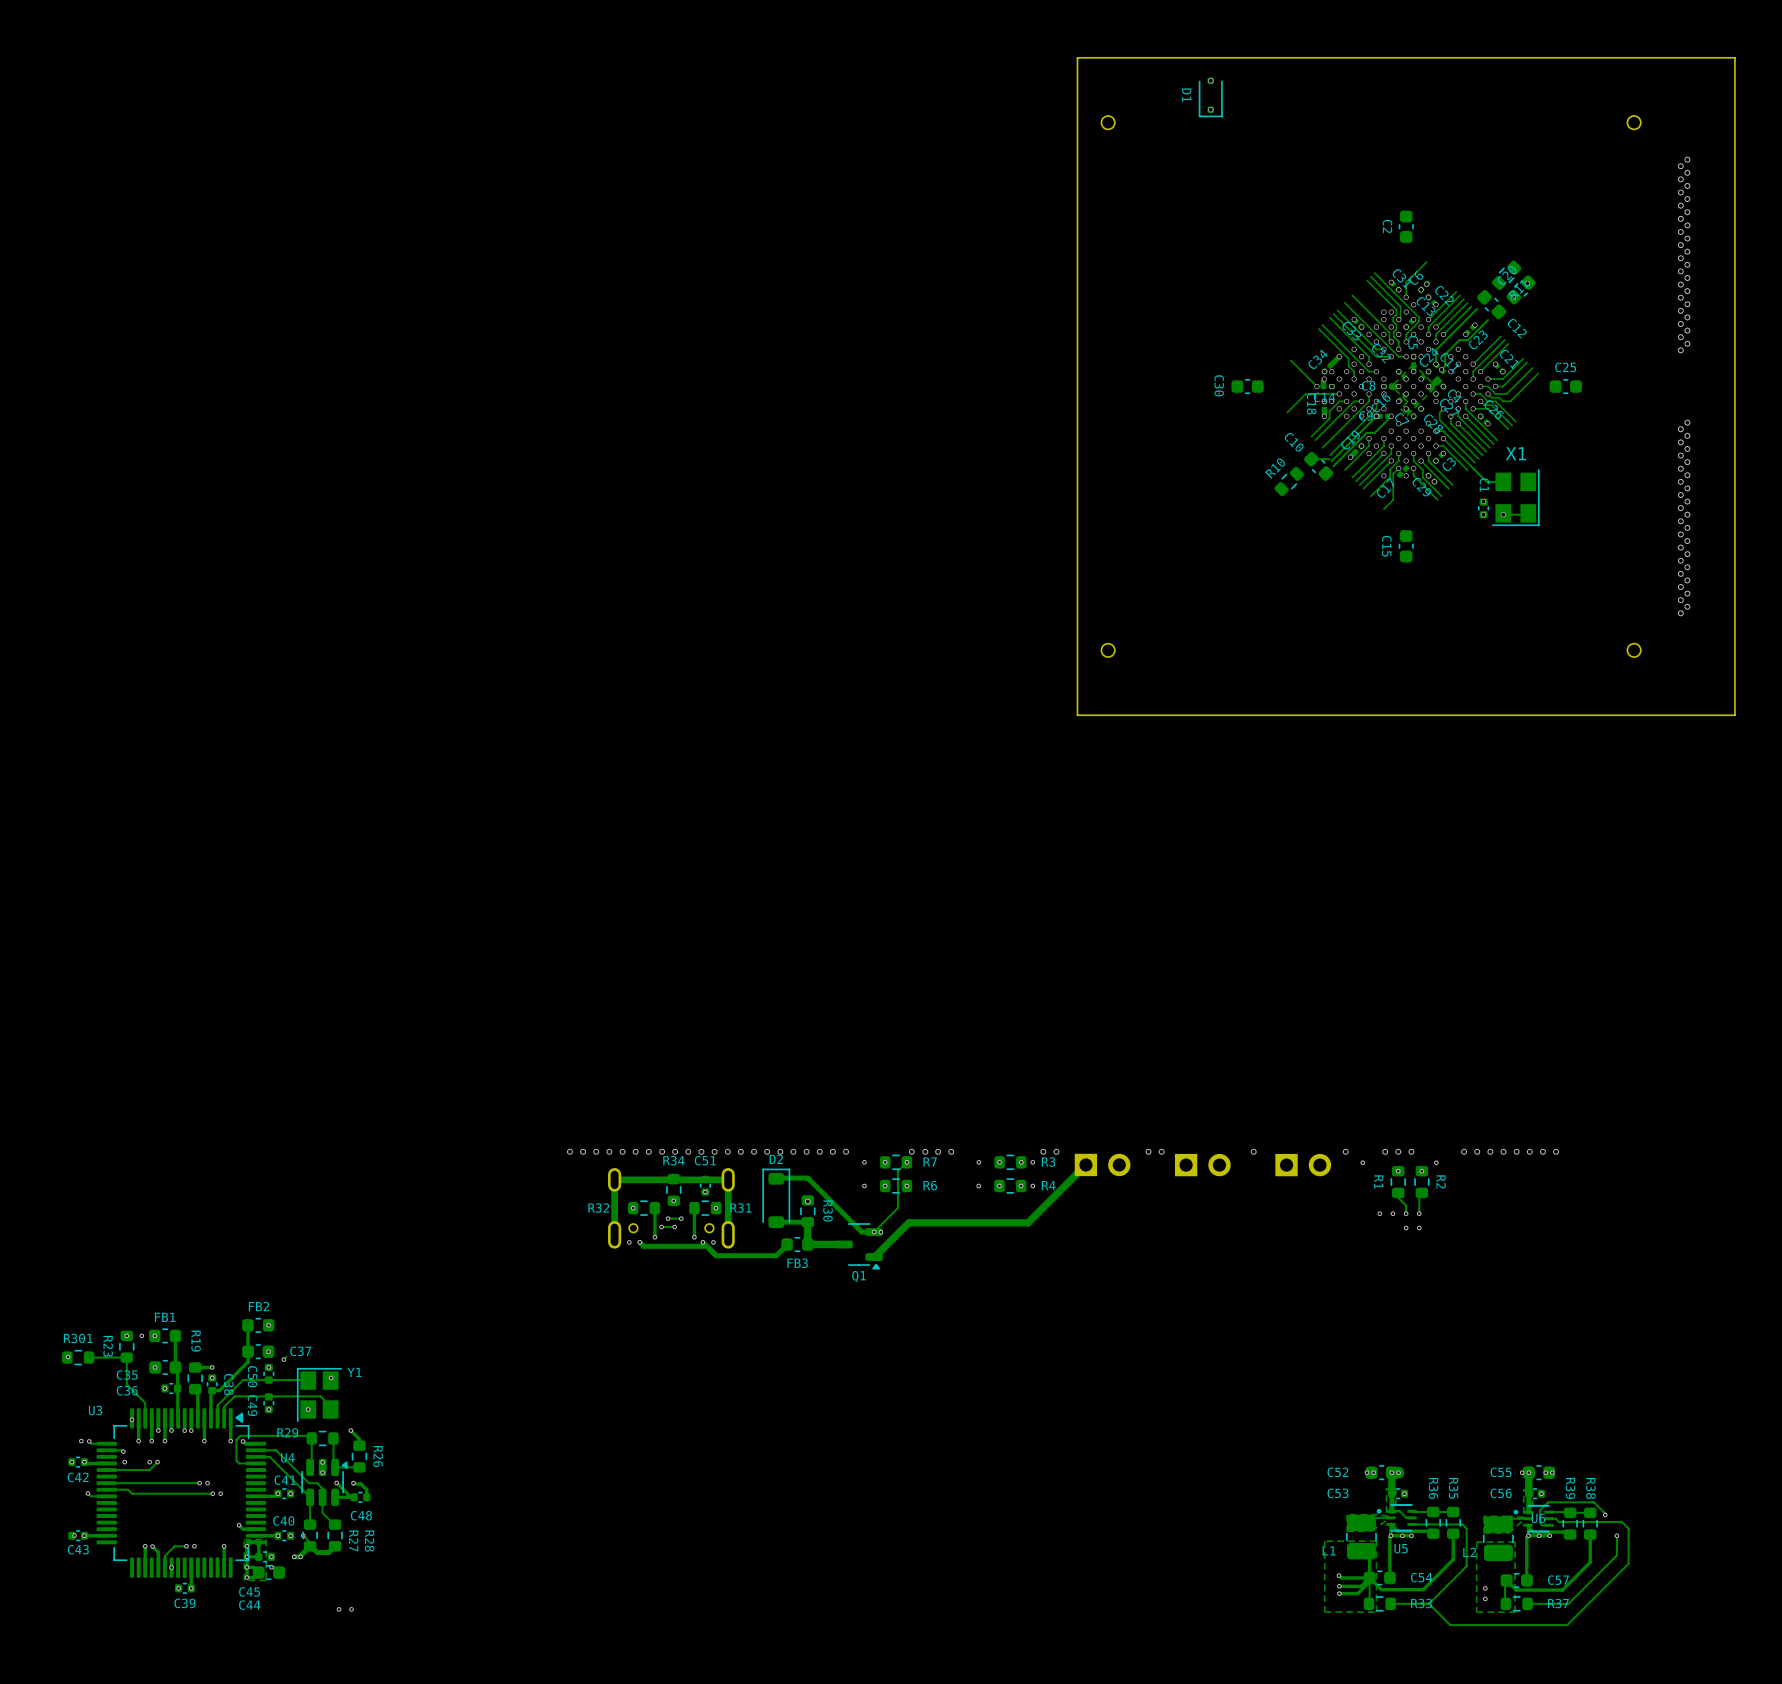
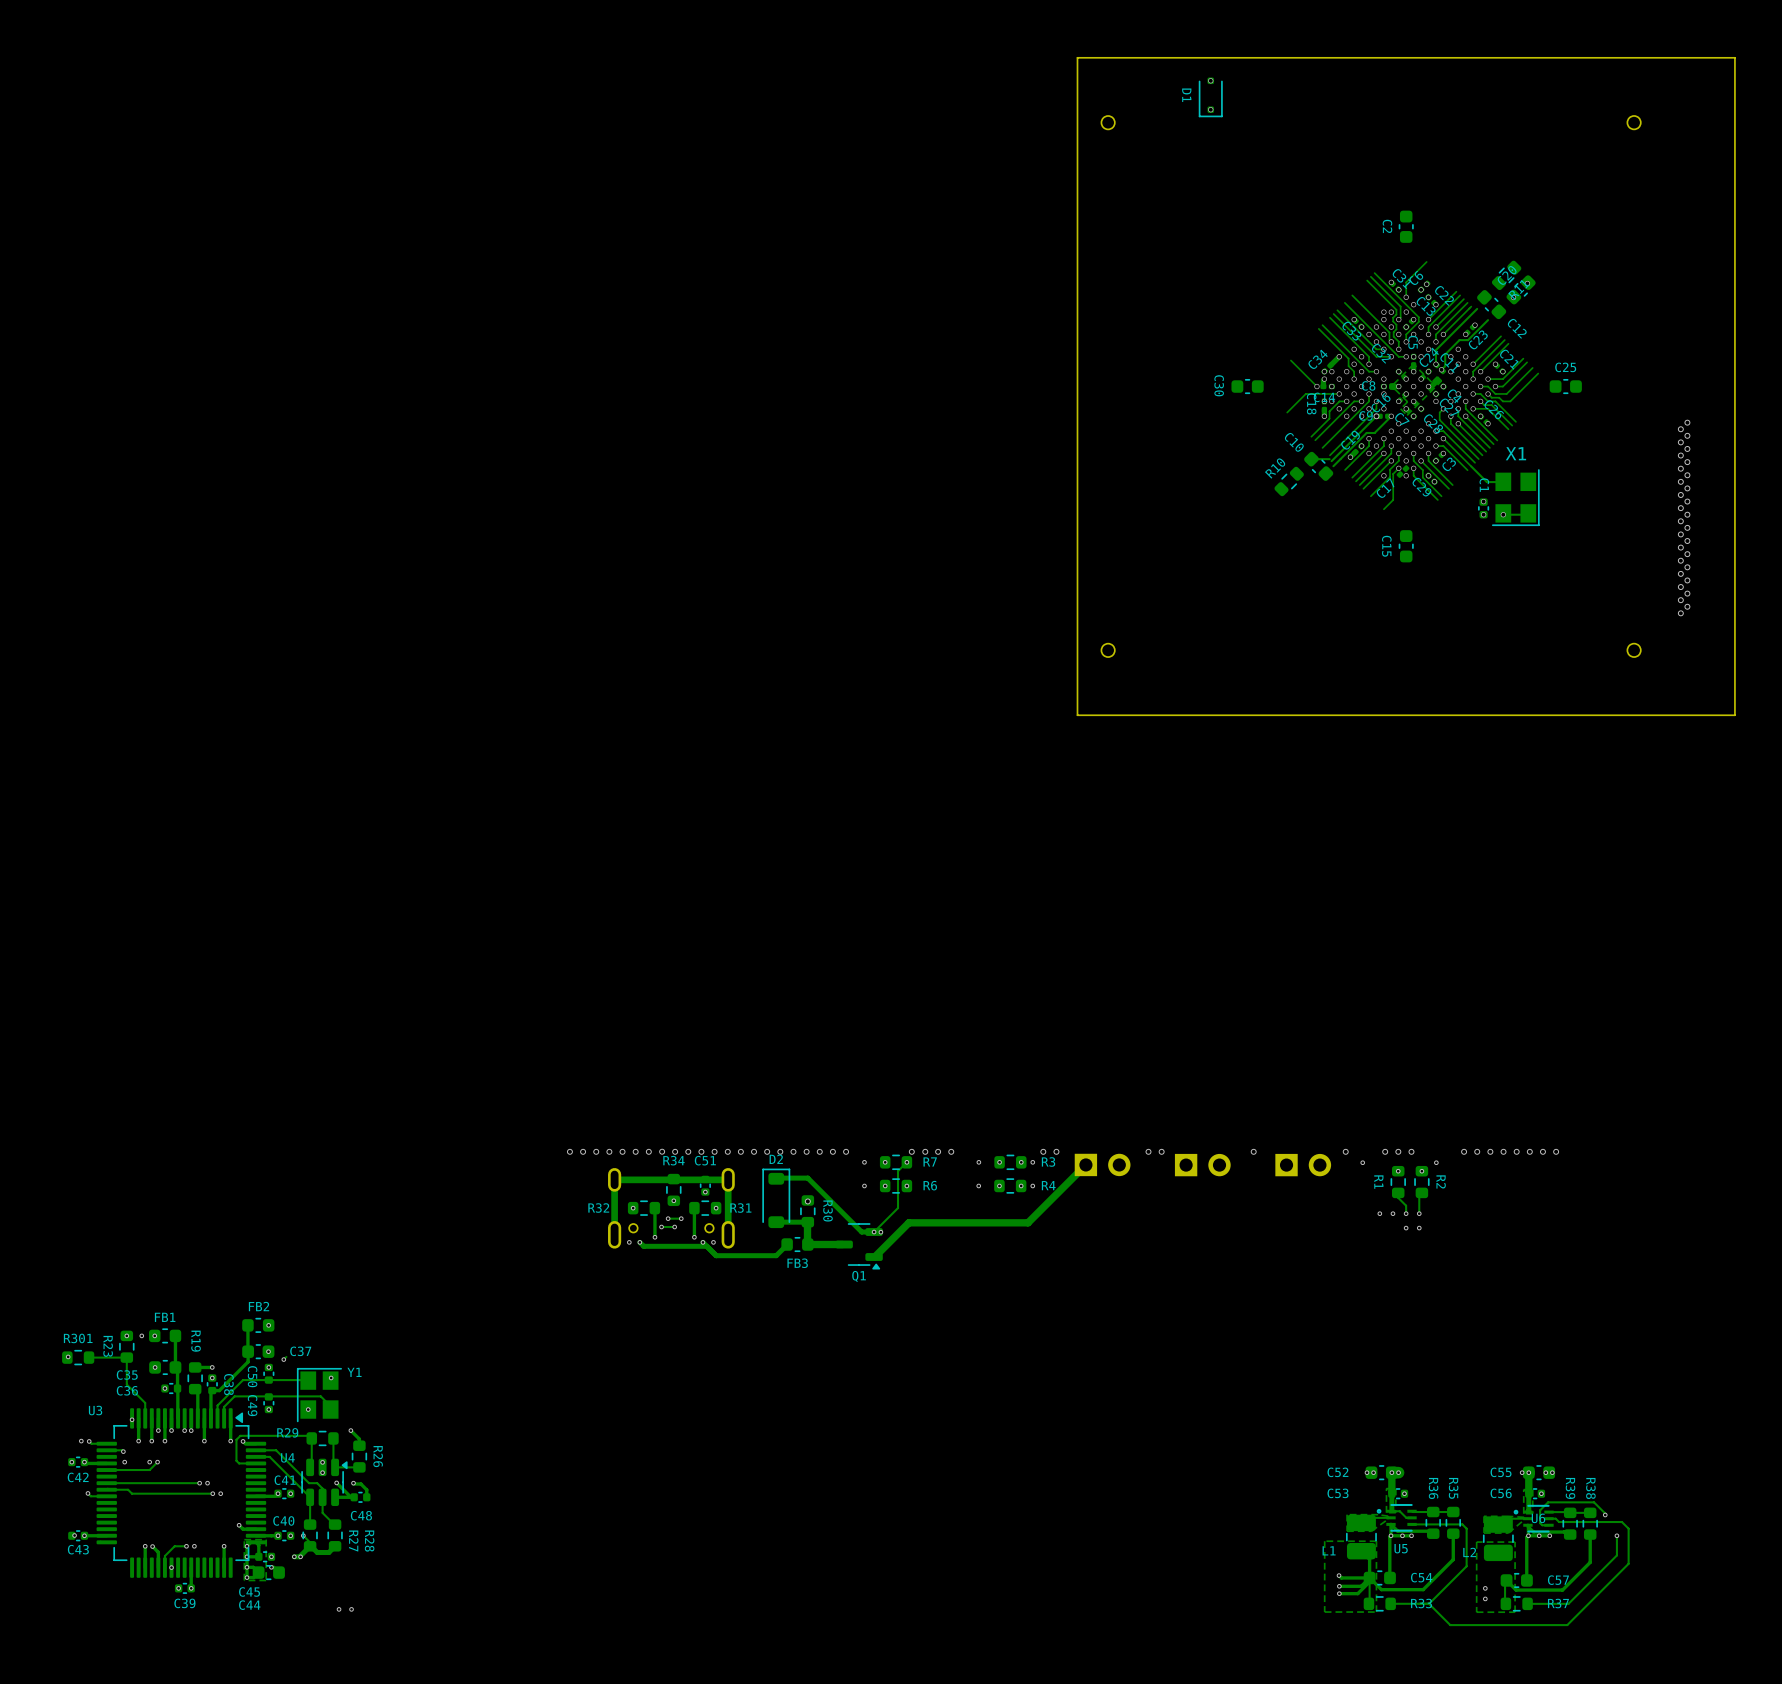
via: (1687, 159) -> none
via: (1680, 166) -> none
via: (1687, 172) -> none
via: (1680, 179) -> none
via: (1687, 185) -> none
via: (1680, 192) -> none
via: (1687, 199) -> none
via: (1680, 205) -> none
via: (1687, 212) -> none
via: (1680, 218) -> none
via: (1687, 225) -> none
via: (1680, 231) -> none
via: (1687, 238) -> none
via: (1680, 245) -> none
via: (1687, 251) -> none
via: (1680, 258) -> none
via: (1687, 264) -> none
via: (1680, 271) -> none
via: (1687, 277) -> none
via: (1680, 284) -> none
via: (1687, 291) -> none
via: (1680, 297) -> none
via: (1687, 304) -> none
via: (1680, 310) -> none
via: (1687, 317) -> none
via: (1680, 324) -> none
via: (1687, 330) -> none
via: (1680, 337) -> none
via: (1687, 343) -> none
via: (1680, 350) -> none

